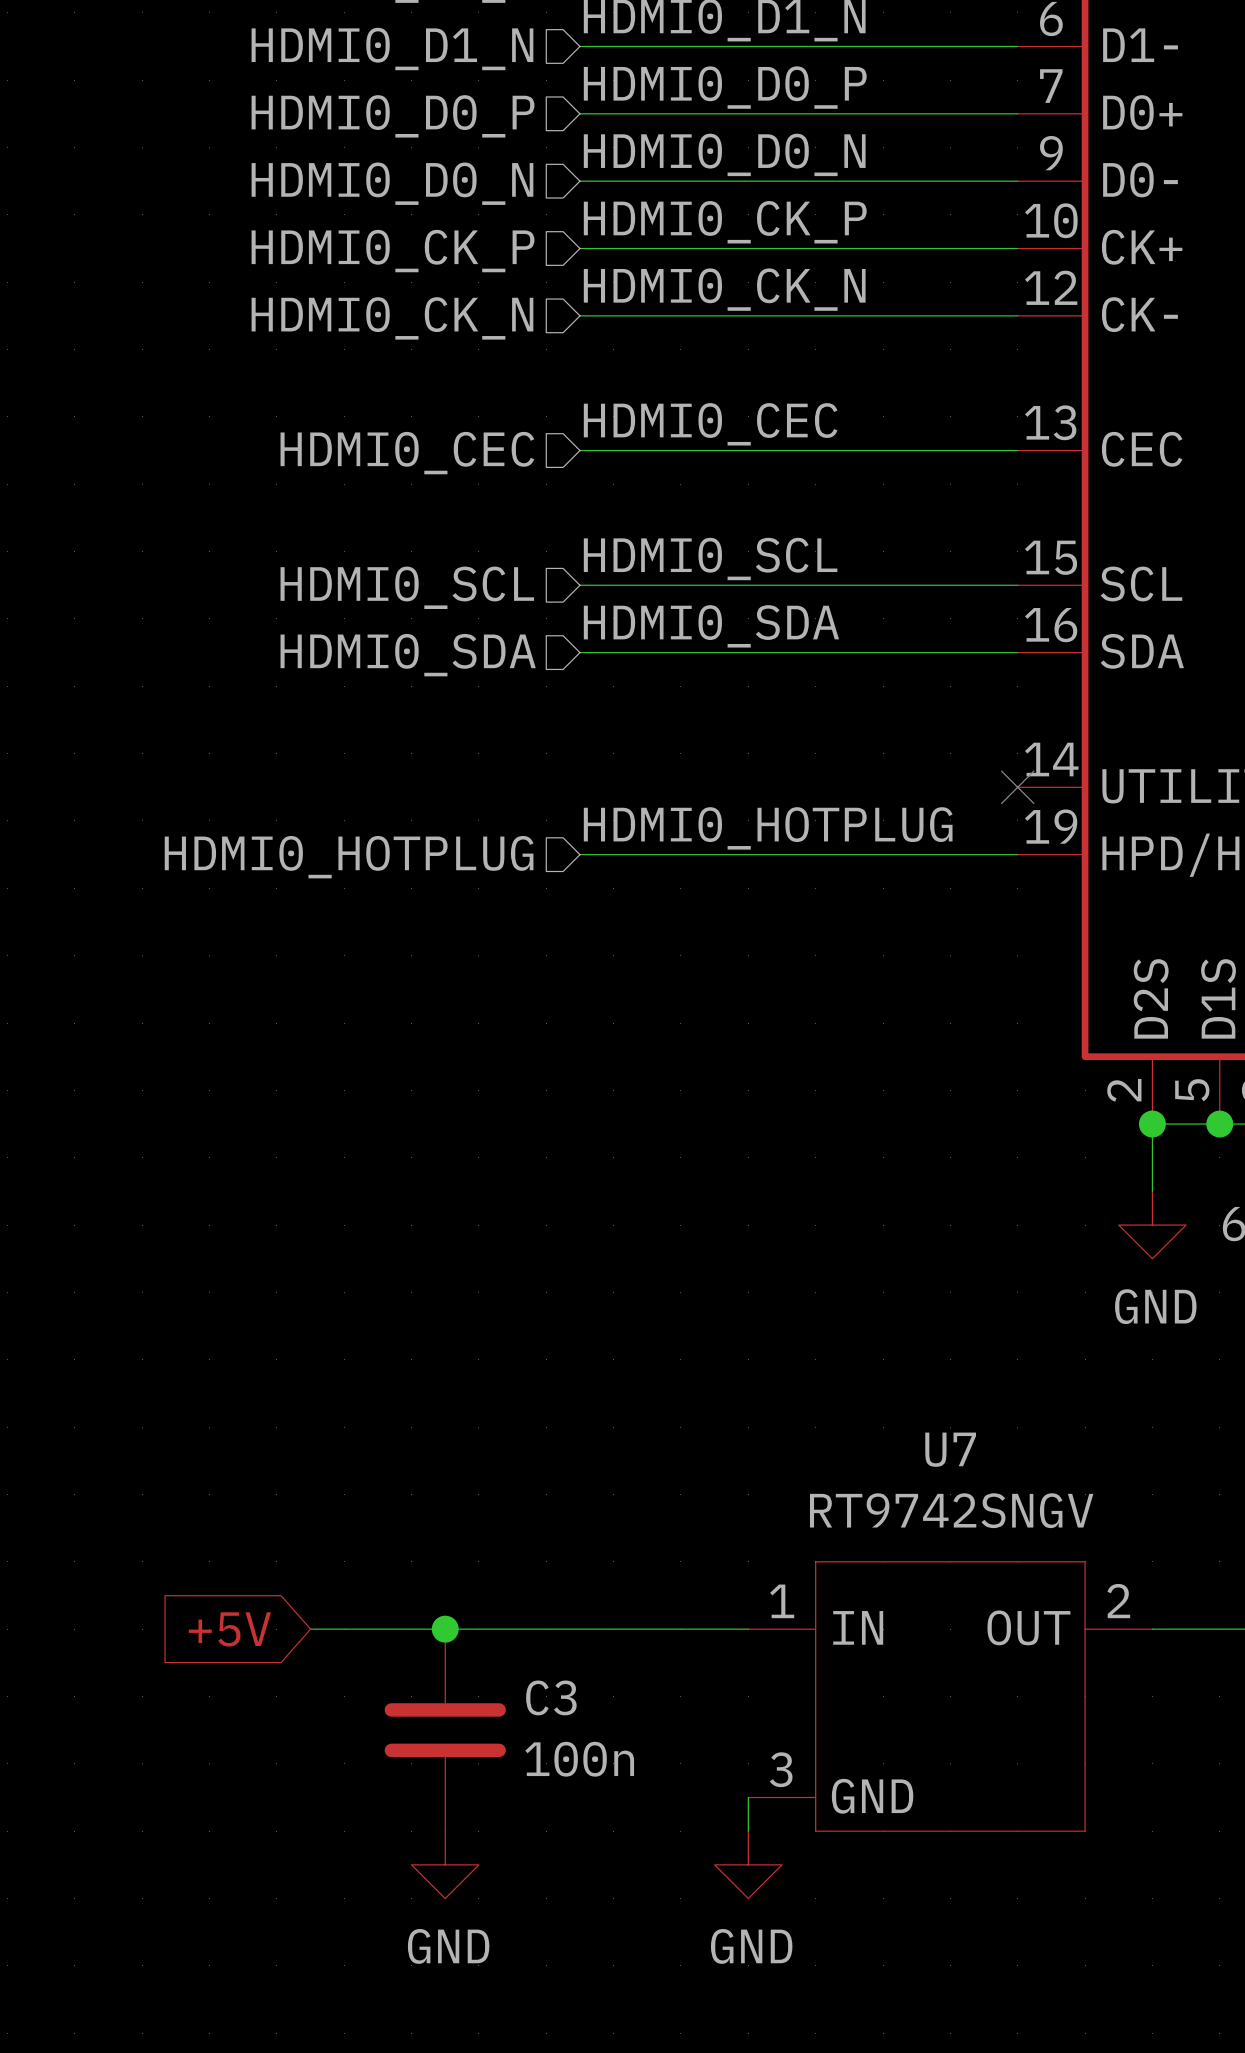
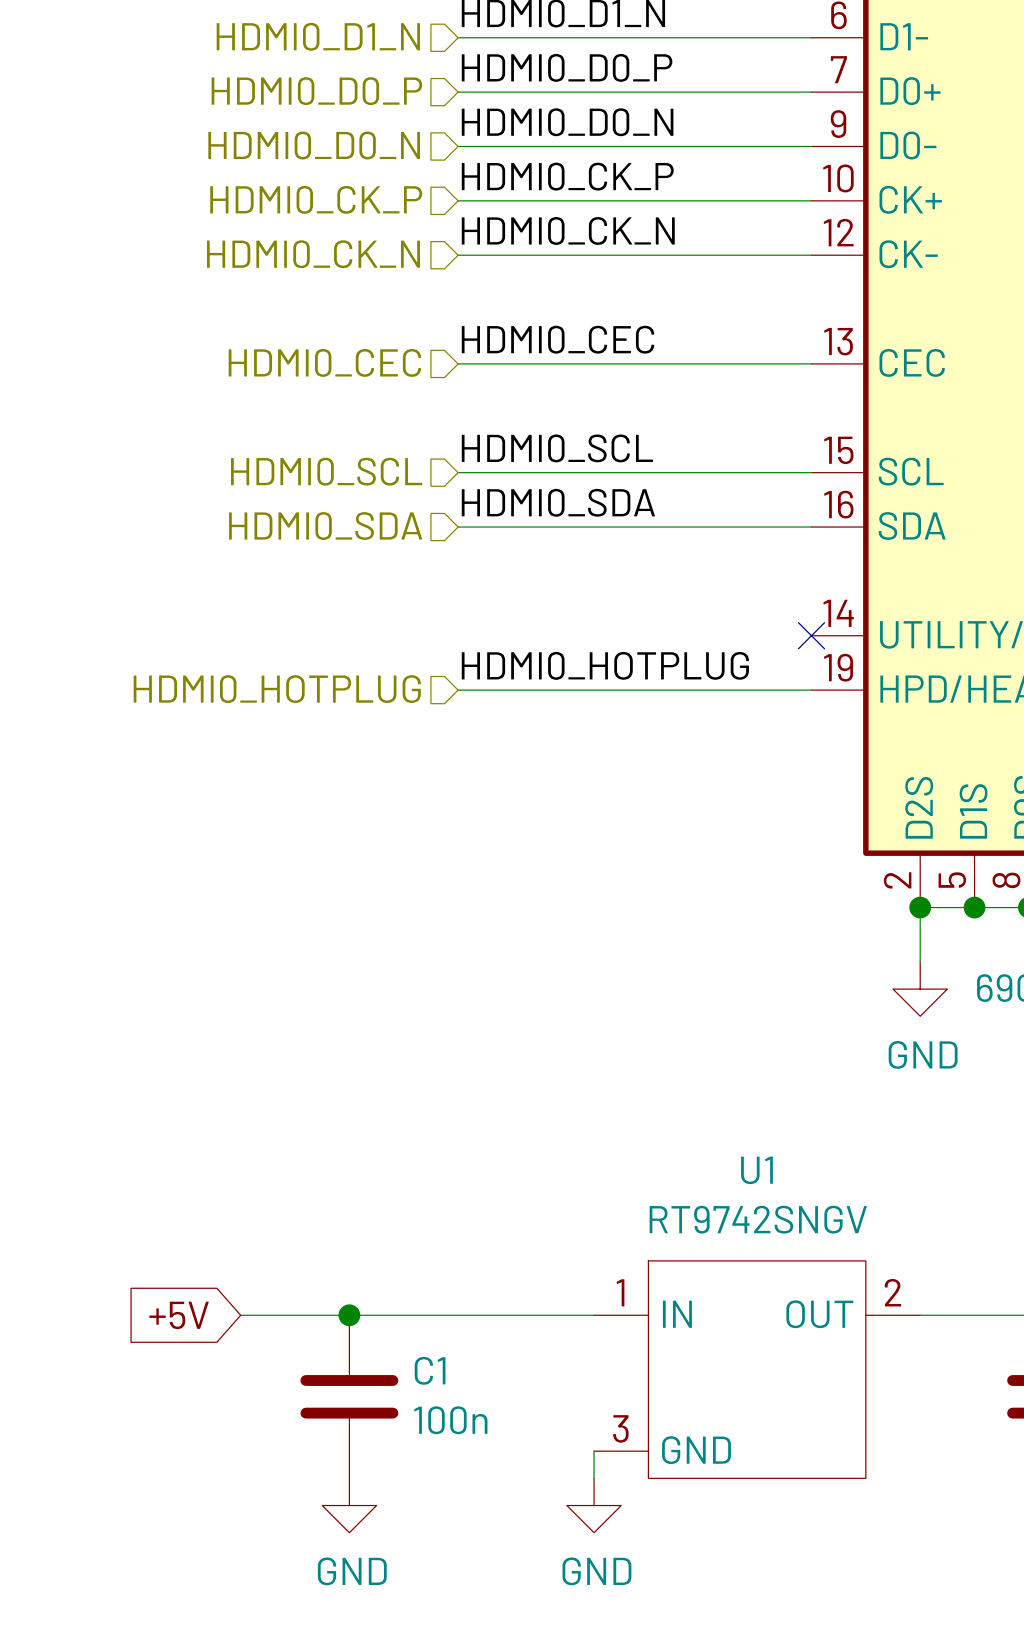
U7 name: U7 (950, 1449) -> U1 (756, 1170)
C3 name: C3 (551, 1697) -> C1 (430, 1370)

